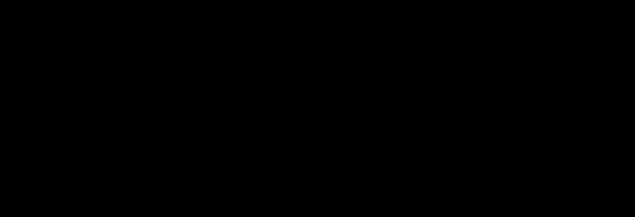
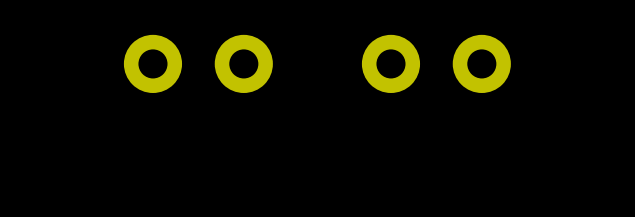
part: none -> (198, 63)
part: none -> (436, 63)

